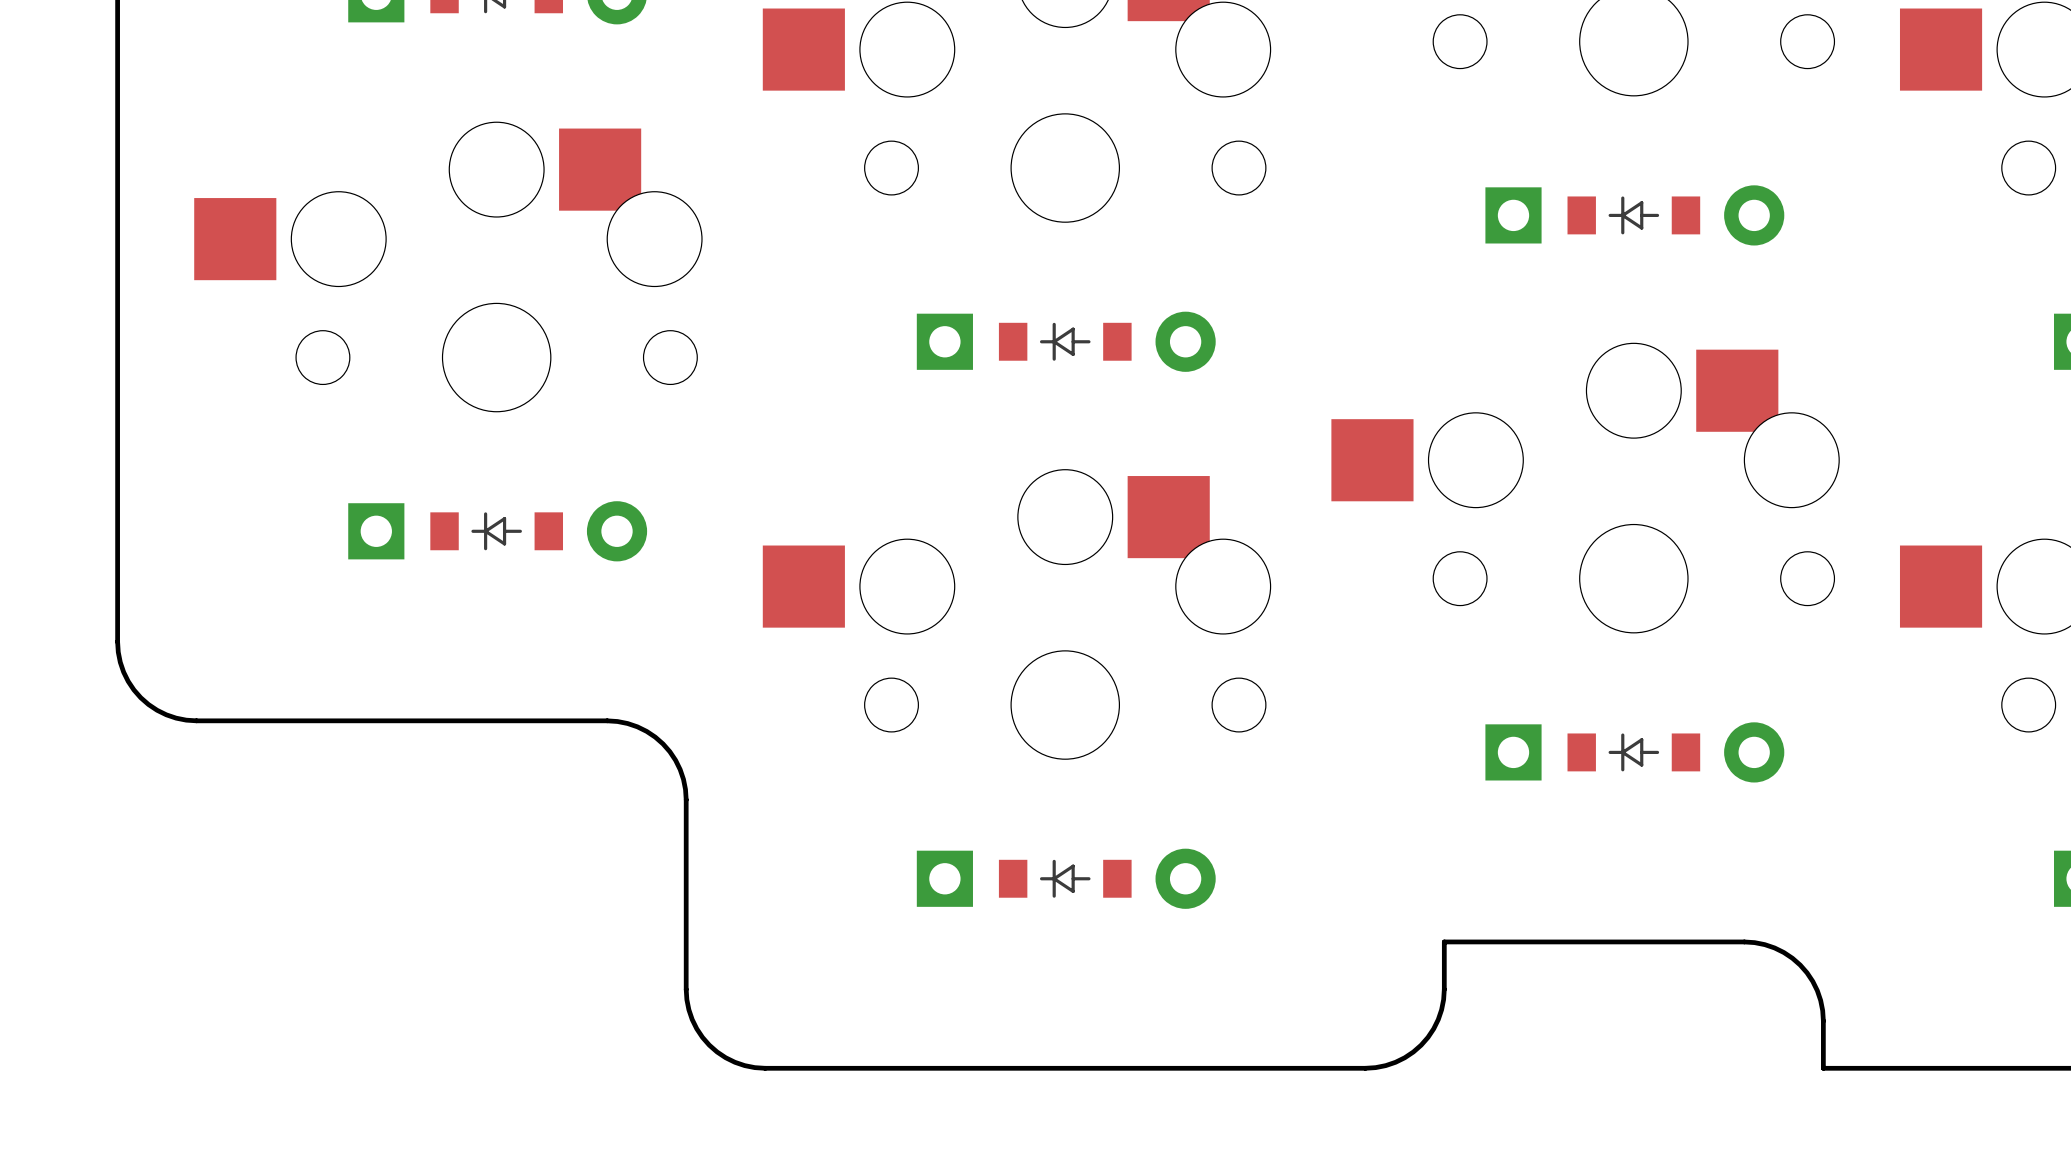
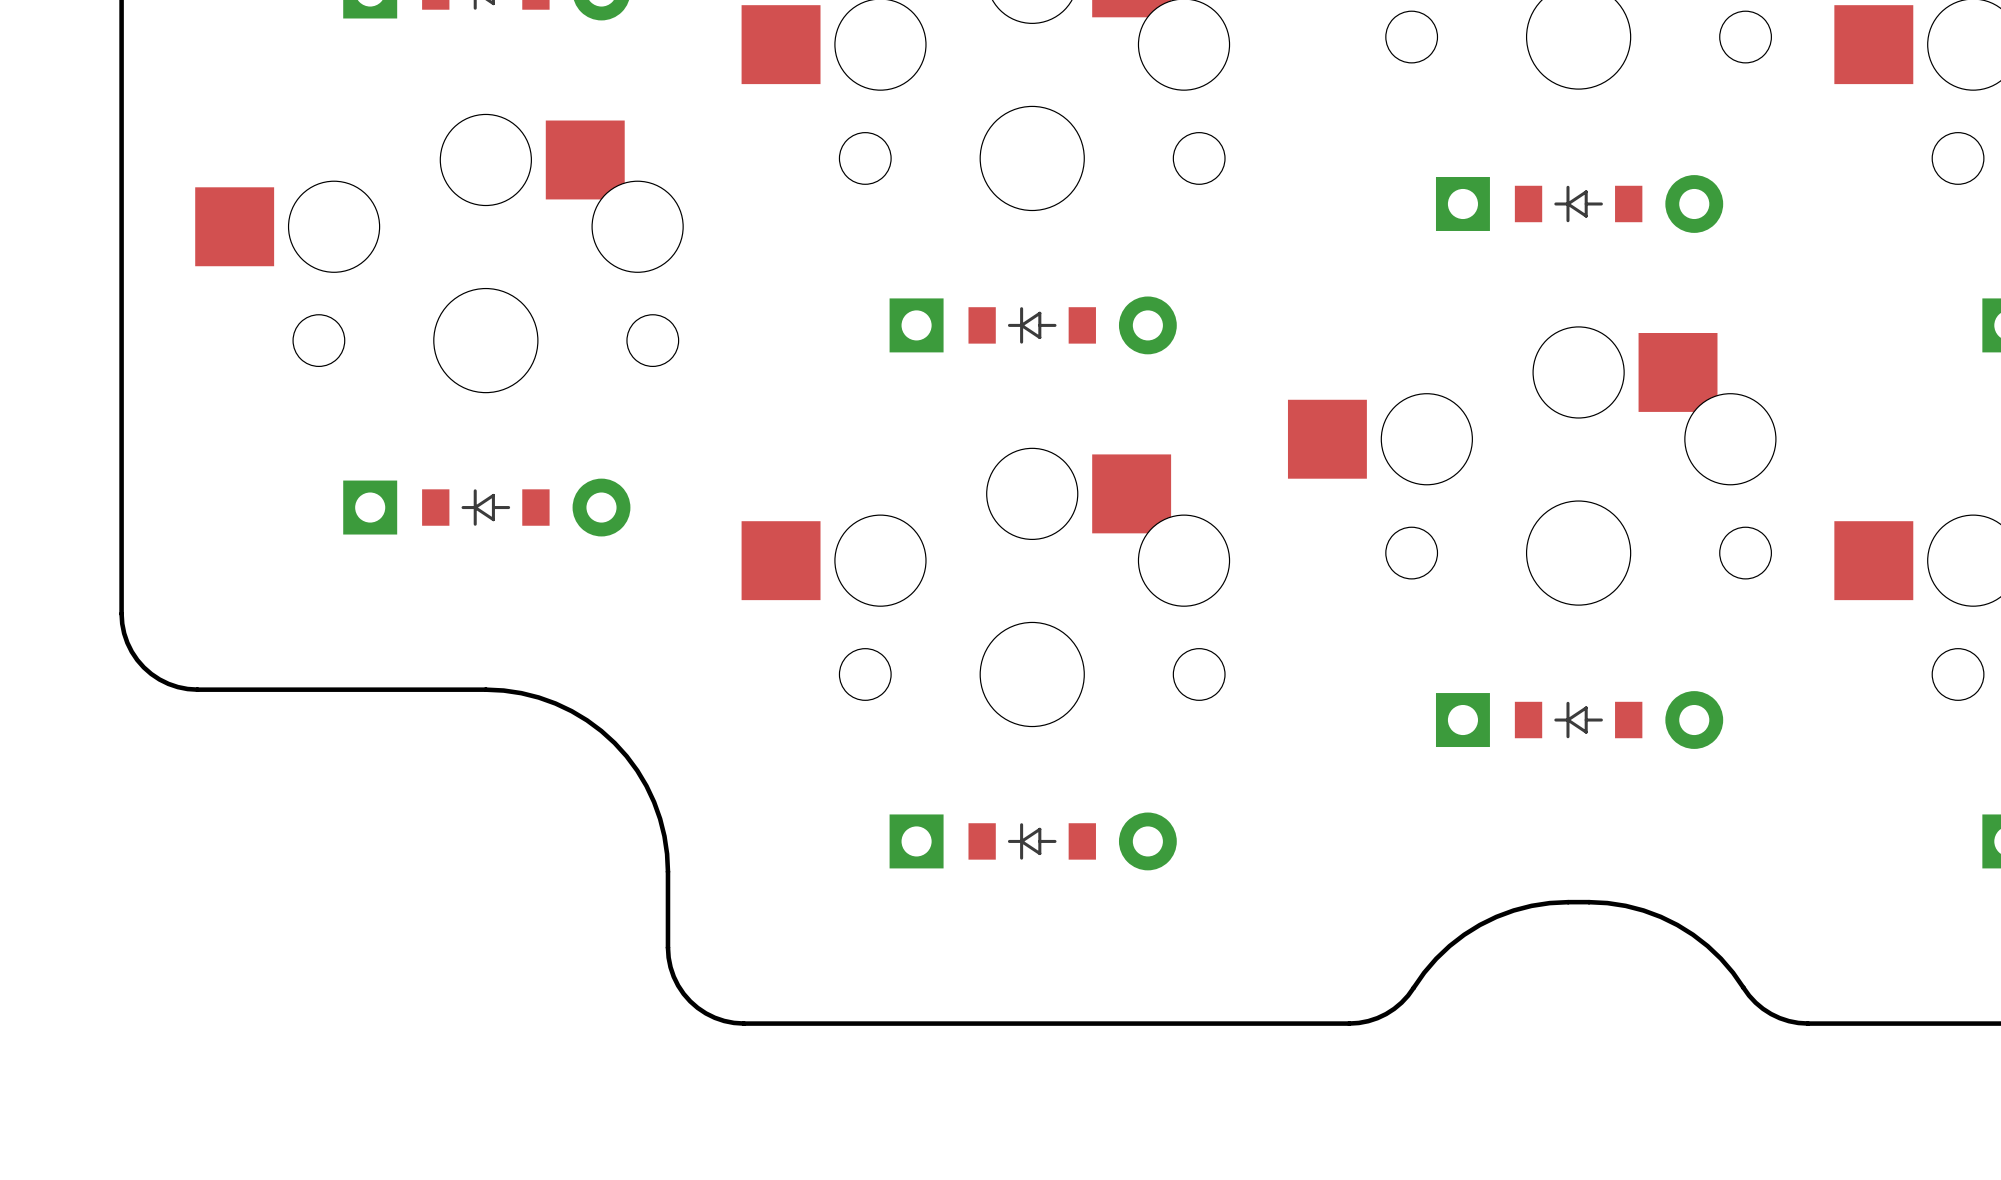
board edge: (496, 720) (617, 721) (646, 731) (663, 743) (680, 769) (685, 789) (686, 910) -> (485, 689) (521, 693) (555, 703) (587, 720) (614, 743) (637, 770) (654, 802) (664, 836) (667, 871)
board edge: (1623, 941) (1444, 941) (1443, 999) (1433, 1028) (1421, 1045) (1404, 1057) (1385, 1065) (1365, 1068) -> (1568, 902) (1531, 905) (1496, 916) (1479, 925) (1464, 934) (1436, 958) (1408, 995) (1386, 1014) (1358, 1022) (1320, 1023)
board edge: (1644, 941) (1754, 942) (1783, 952) (1807, 972) (1817, 990) (1822, 1010) (1823, 1068) (1872, 1068) -> (1589, 902) (1625, 905) (1643, 910) (1677, 925) (1707, 946) (1720, 958) (1749, 995) (1763, 1008) (1788, 1021) (1807, 1023)

